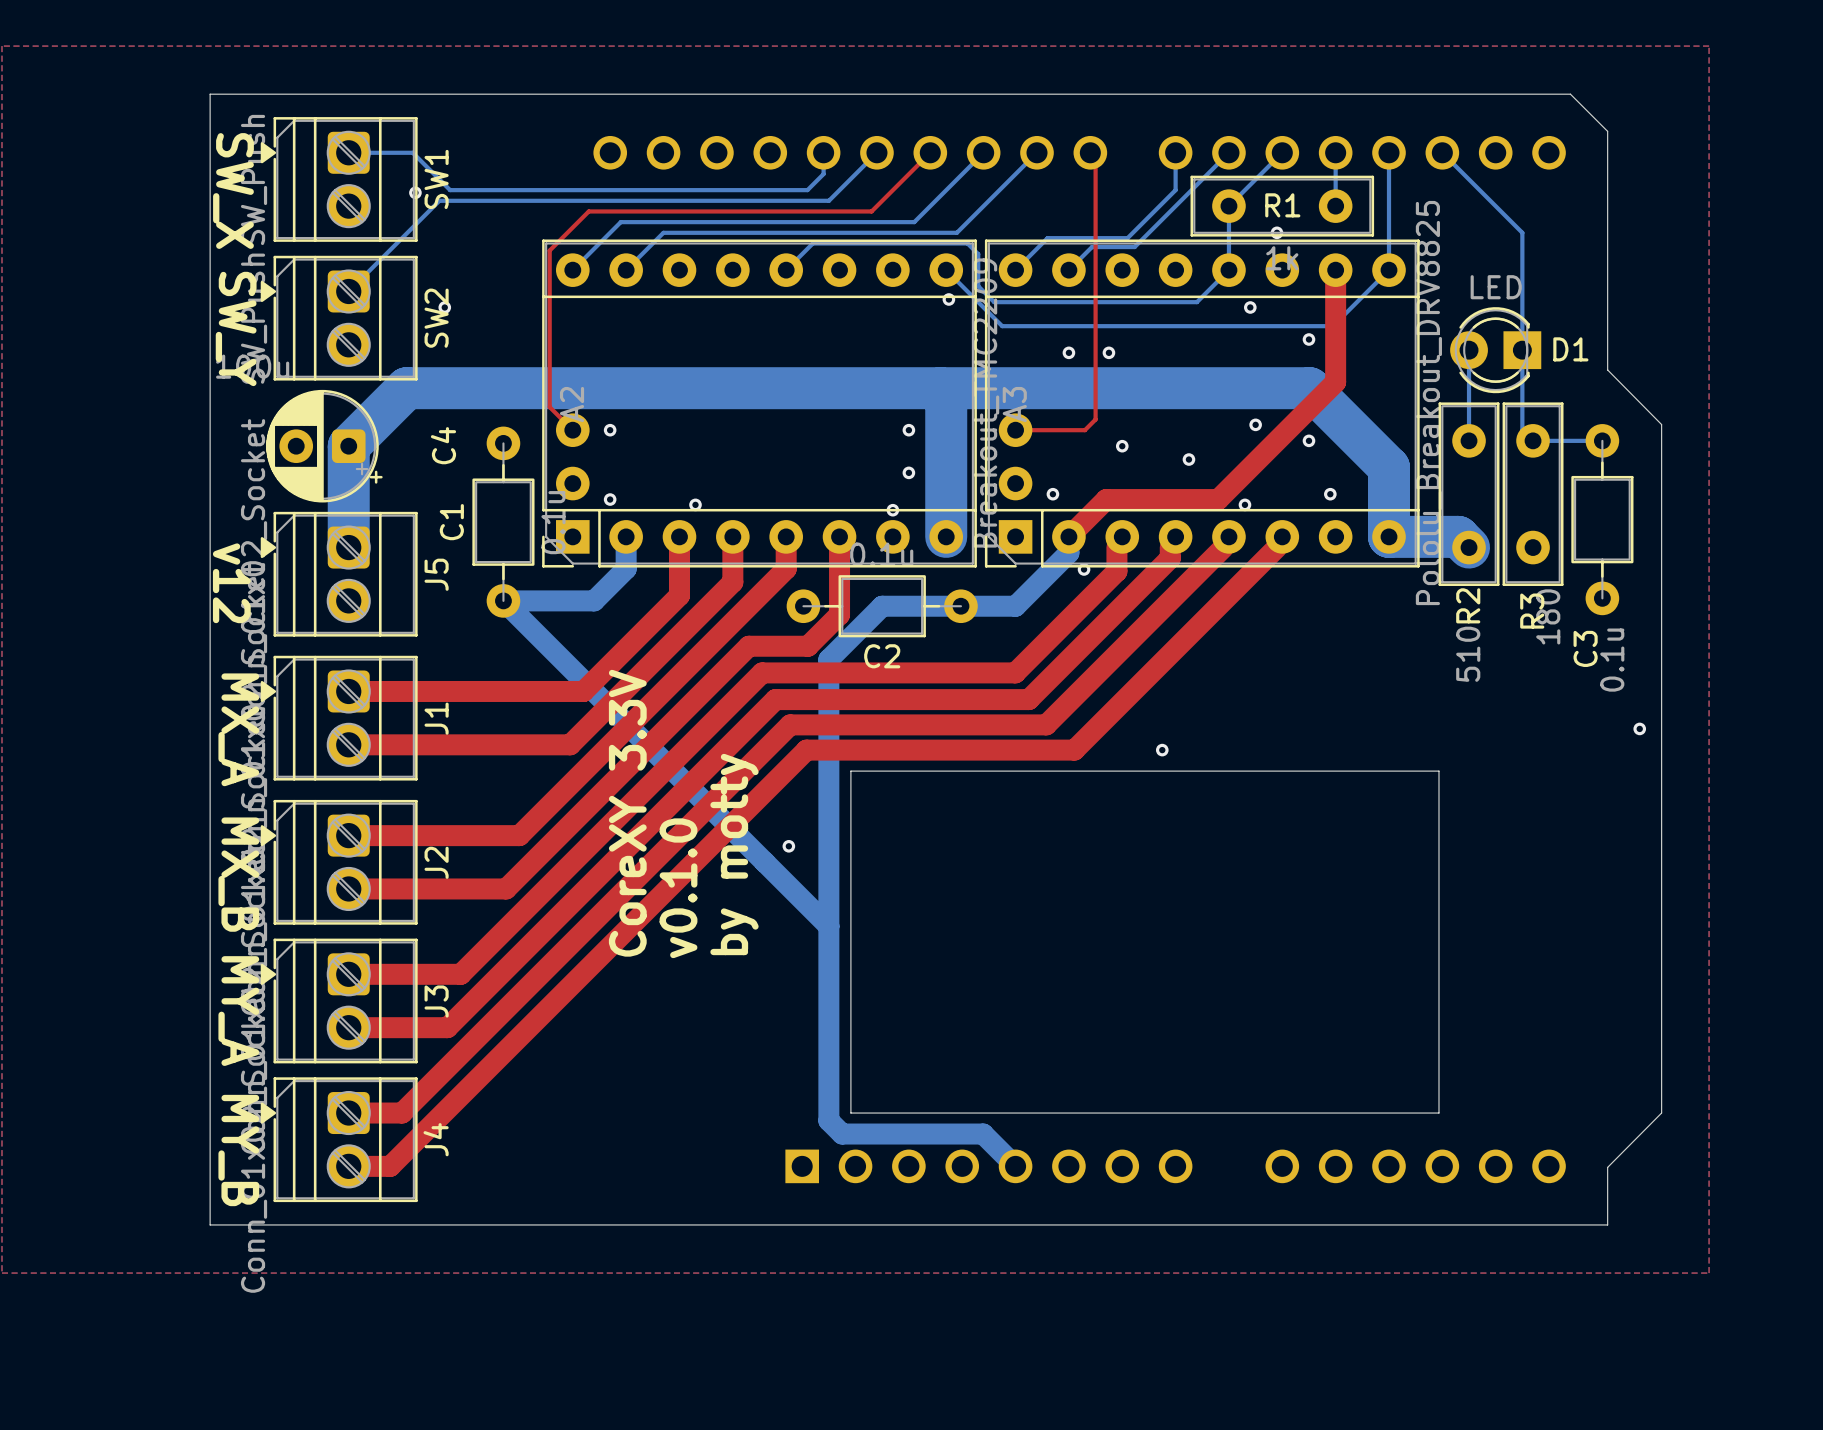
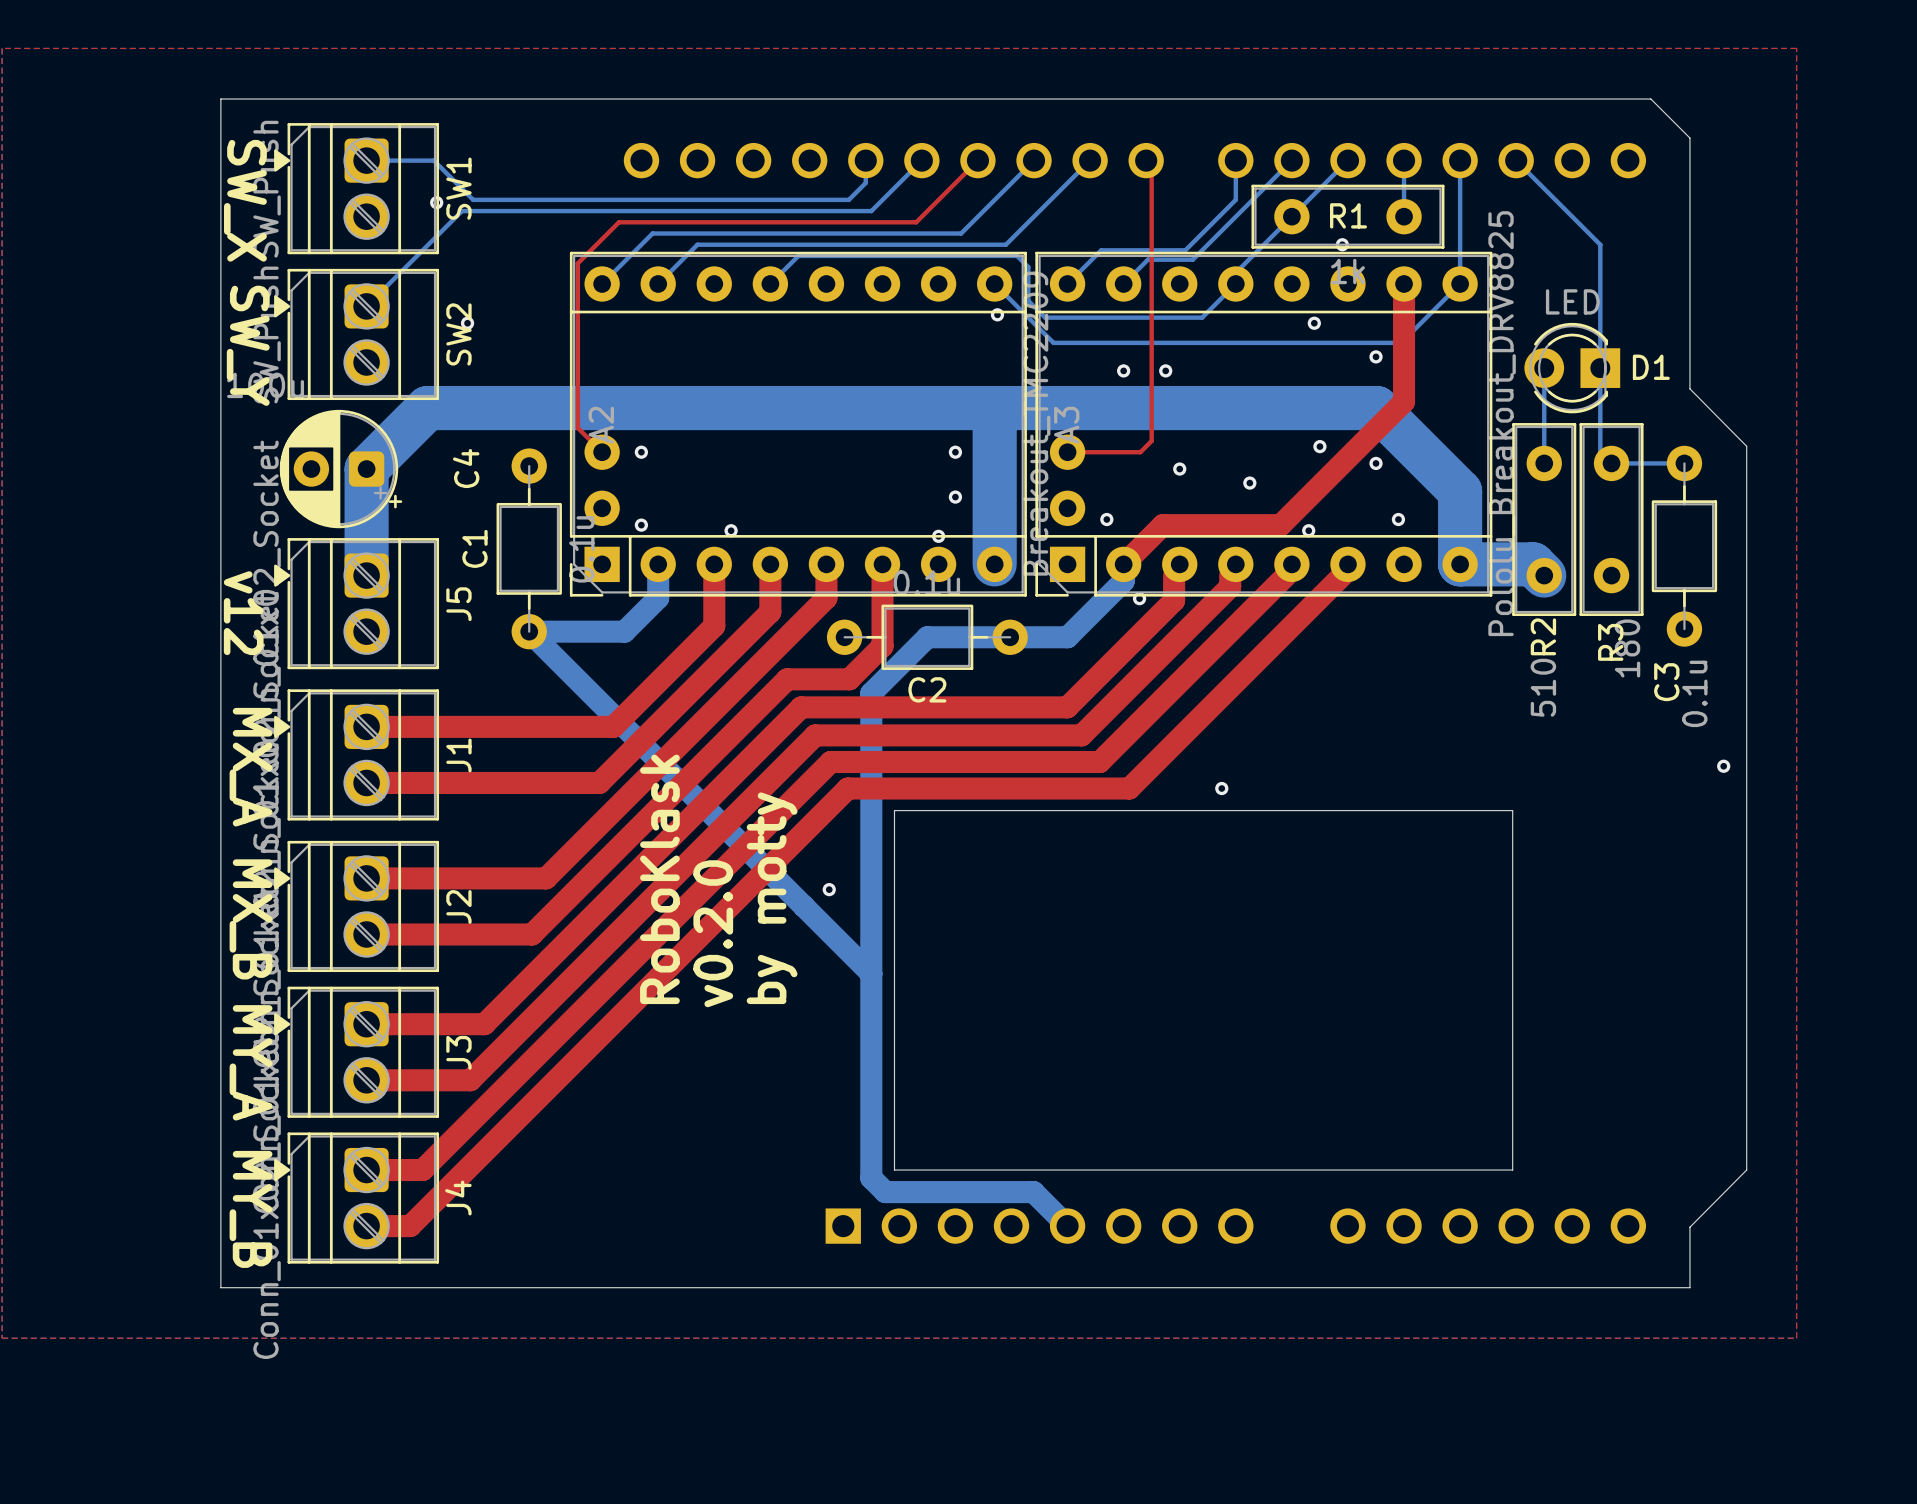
bottom track: (1228, 206) (1228, 270) (1196, 302) (1143, 302) -> (1291, 216) (1235, 272) (1235, 283) (1202, 317)
bottom track: (812, 243) (786, 270) -> (854, 255) (798, 255) (770, 283)
text: CoreXY 3.3V (627, 813) -> RoboKlask (659, 879)
text: v0.1.0 (678, 888) -> v0.2.0 (713, 933)

